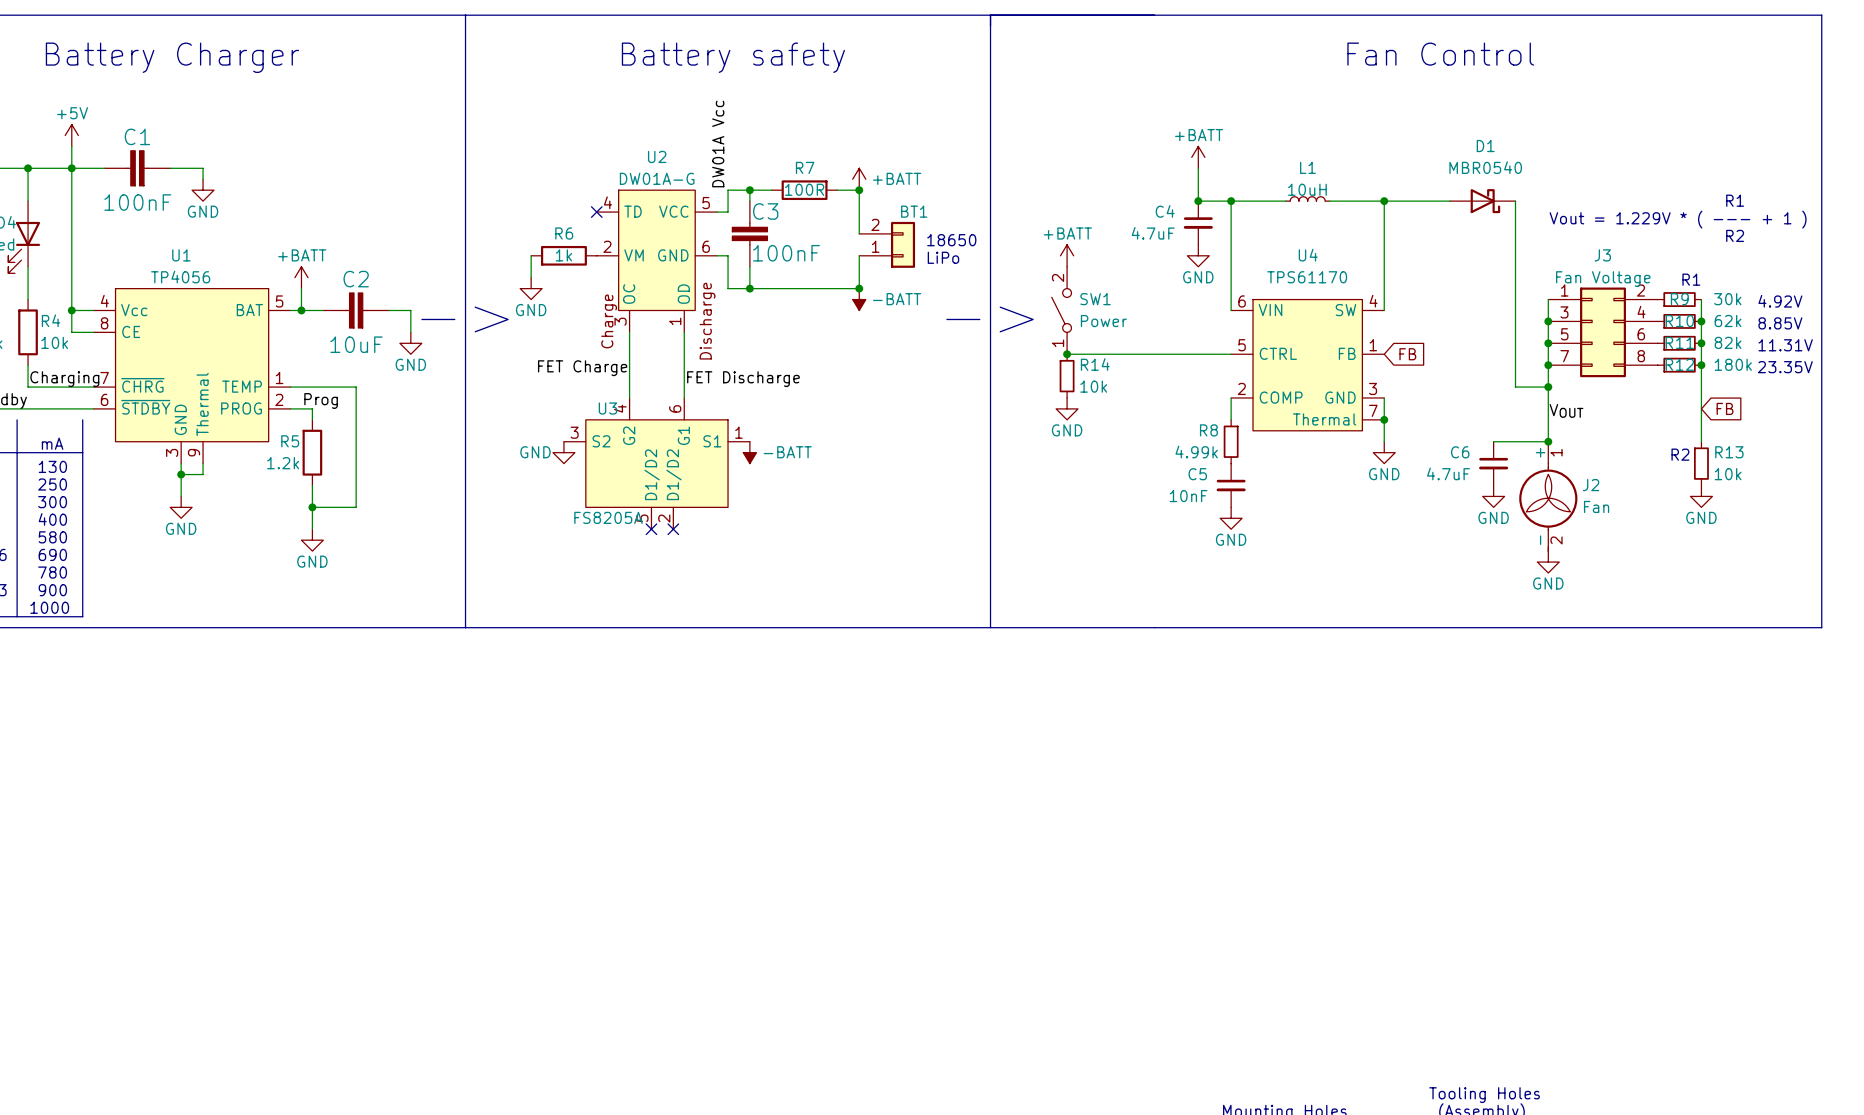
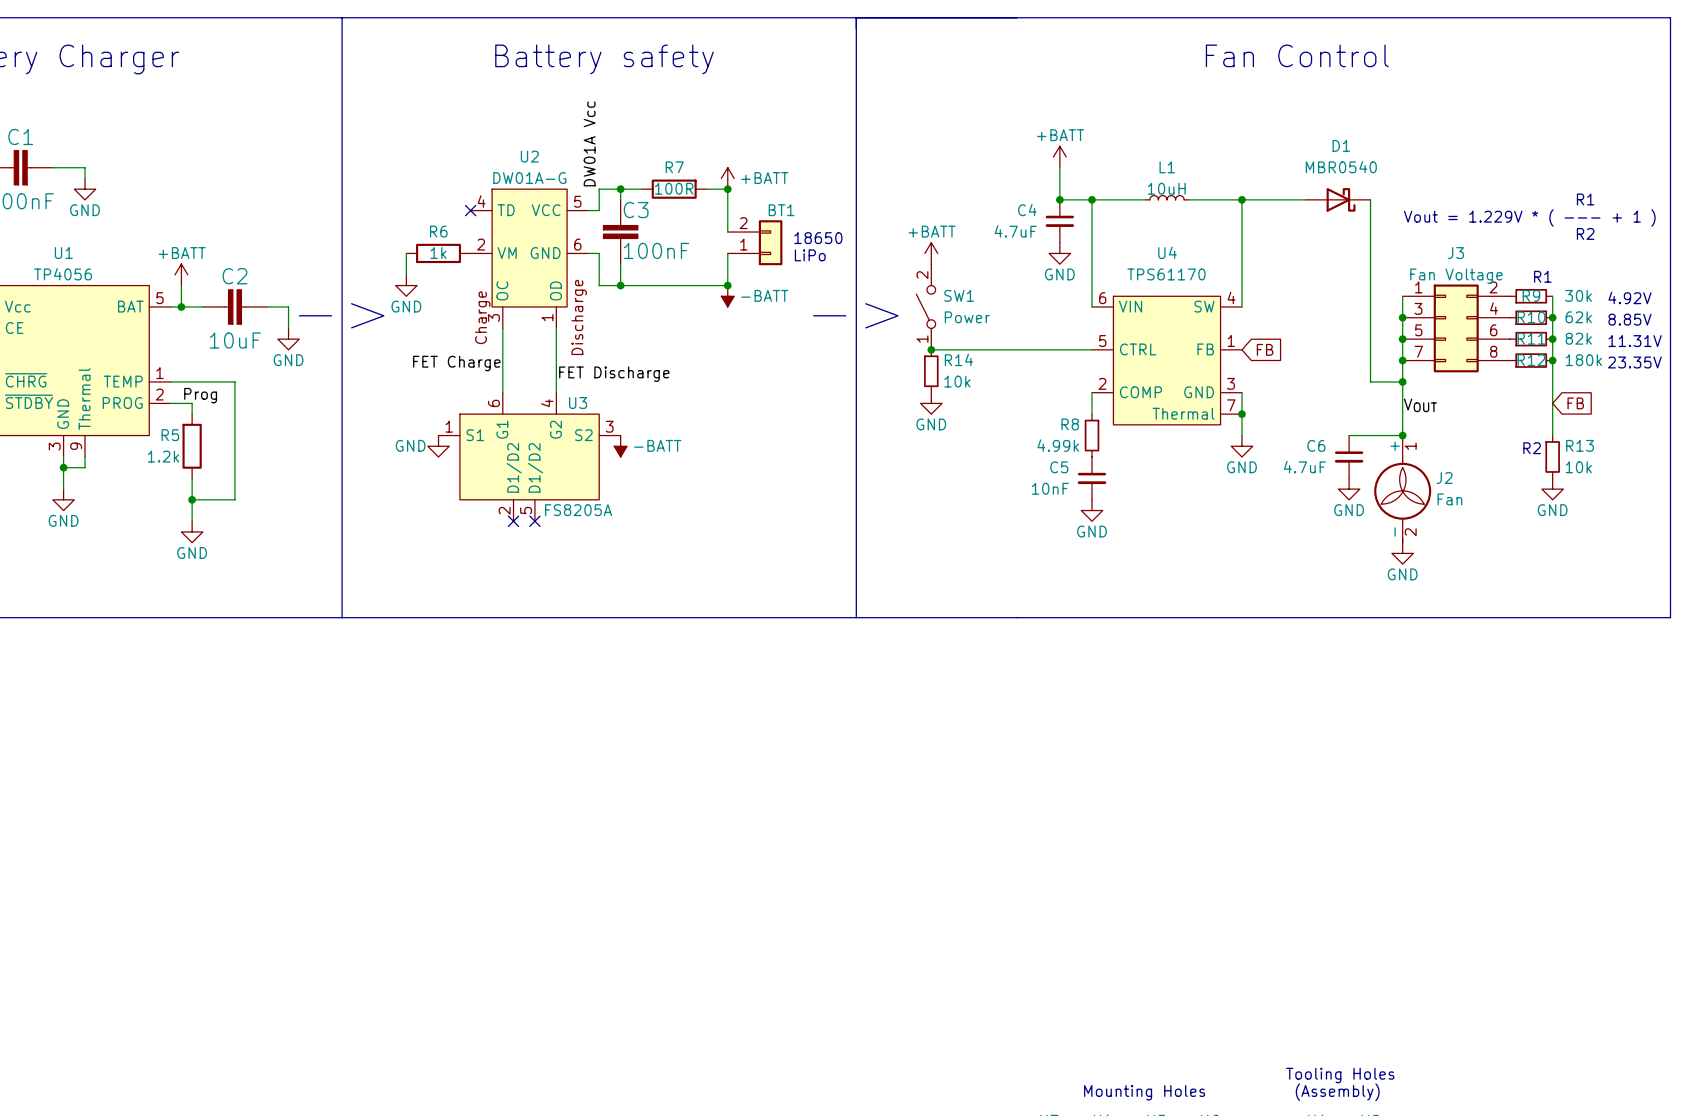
U3 flip: as is (656, 463) -> left-right (529, 456)
no-connect mark: none -> (513, 521)
no-connect mark: (651, 529) -> none
no-connect mark: none -> (534, 521)
no-connect mark: (673, 529) -> none

